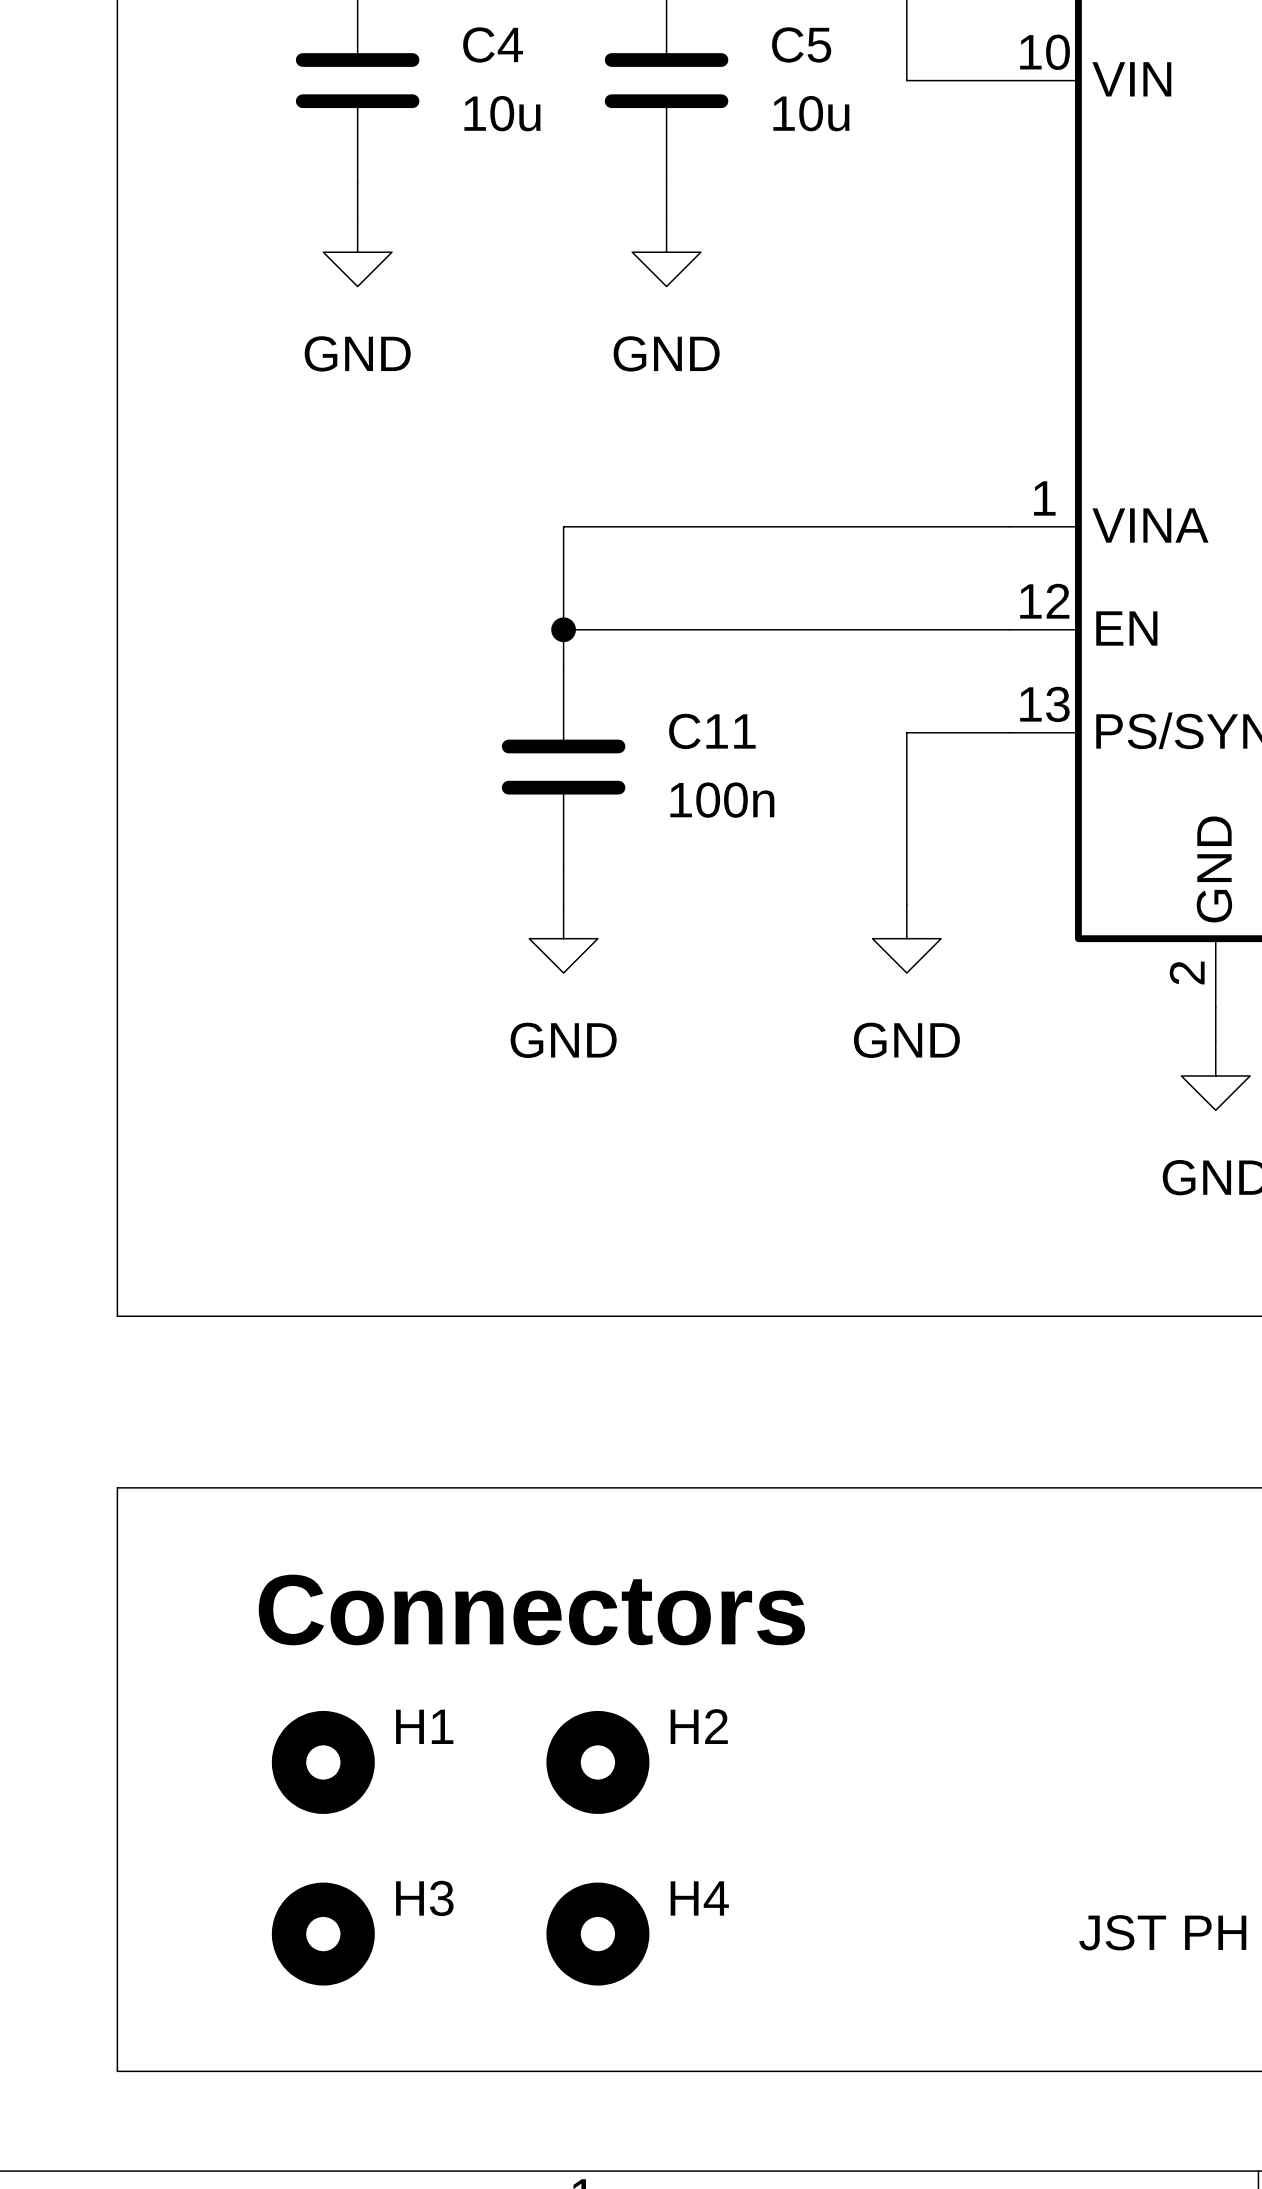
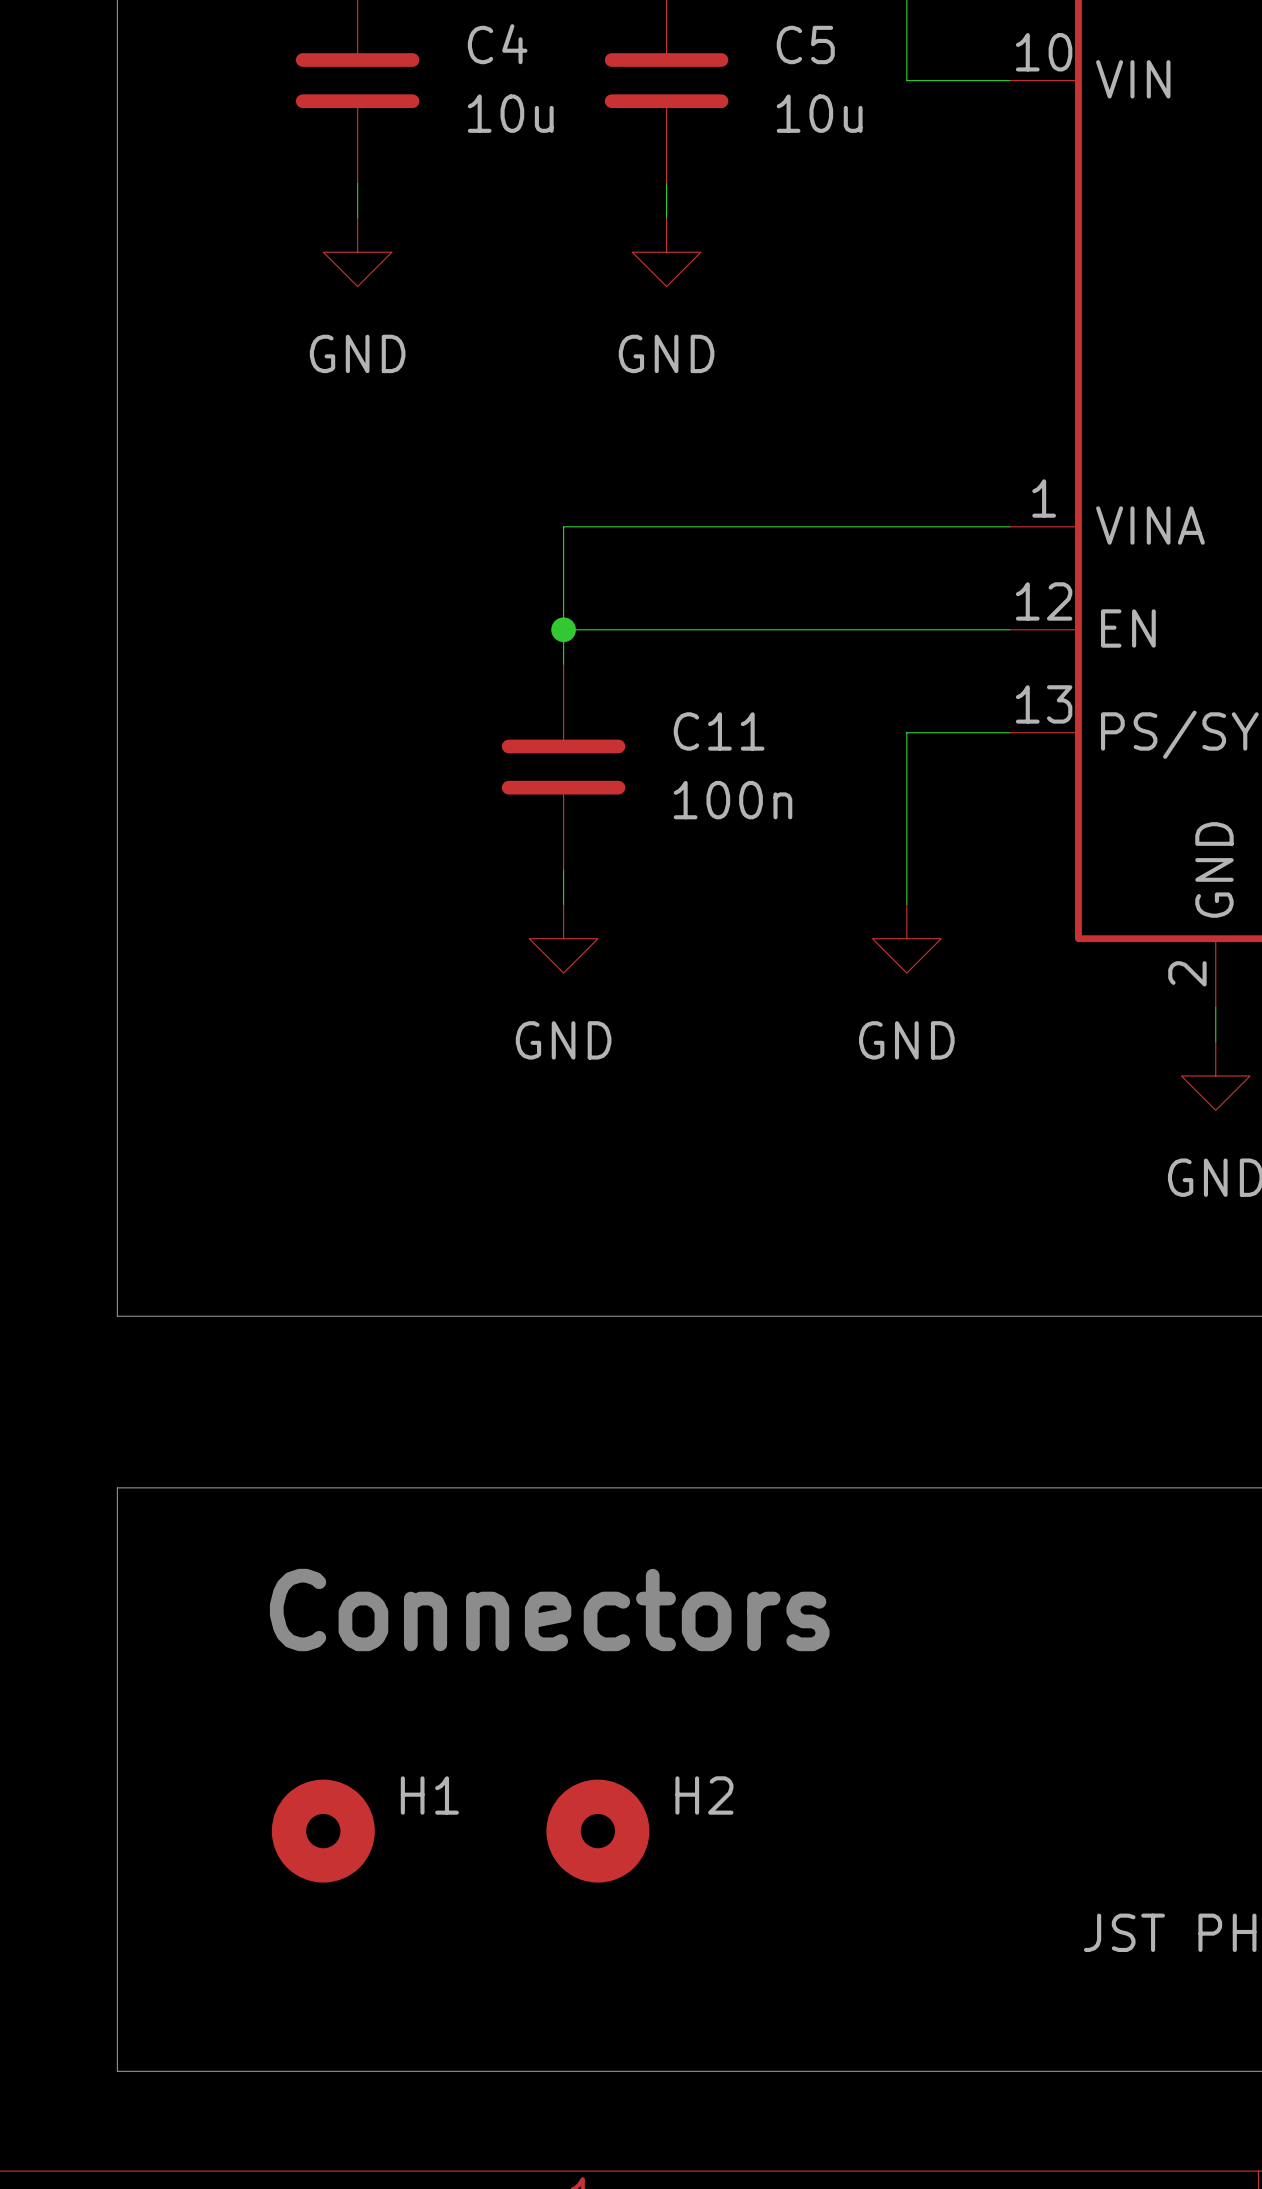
H1 position: (323, 1762) -> (323, 1831)
H2 position: (597, 1762) -> (597, 1831)
H3: (323, 1934) -> none
H4: (597, 1934) -> none

